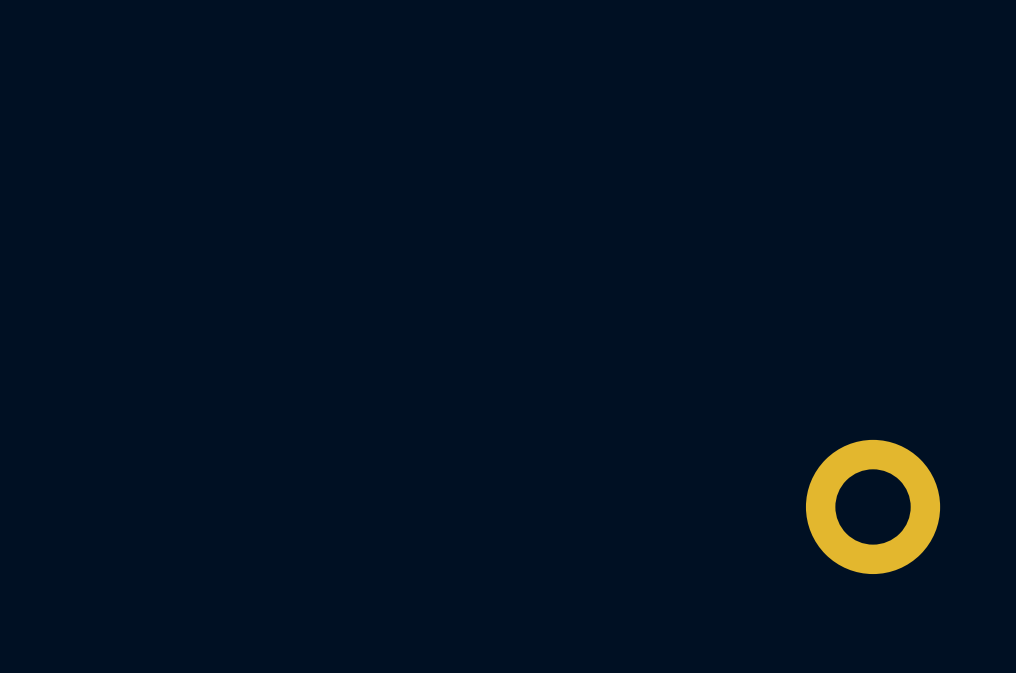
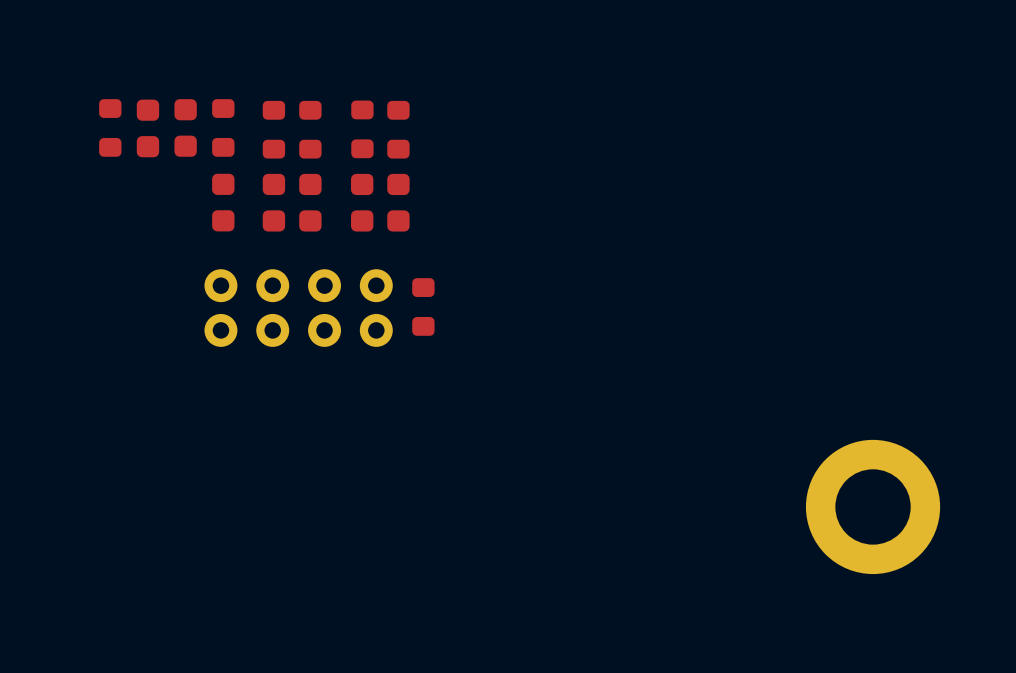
part: none -> (110, 127)
part: none -> (185, 127)
part: none -> (223, 127)
part: none -> (147, 128)
part: none -> (273, 129)
part: none -> (310, 129)
part: none -> (362, 129)
part: none -> (398, 129)
part: none -> (223, 202)
part: none -> (273, 202)
part: none -> (310, 202)
part: none -> (362, 202)
part: none -> (398, 202)
part: none -> (423, 306)
part: none -> (220, 308)
part: none -> (272, 308)
part: none -> (324, 308)
part: none -> (376, 308)

